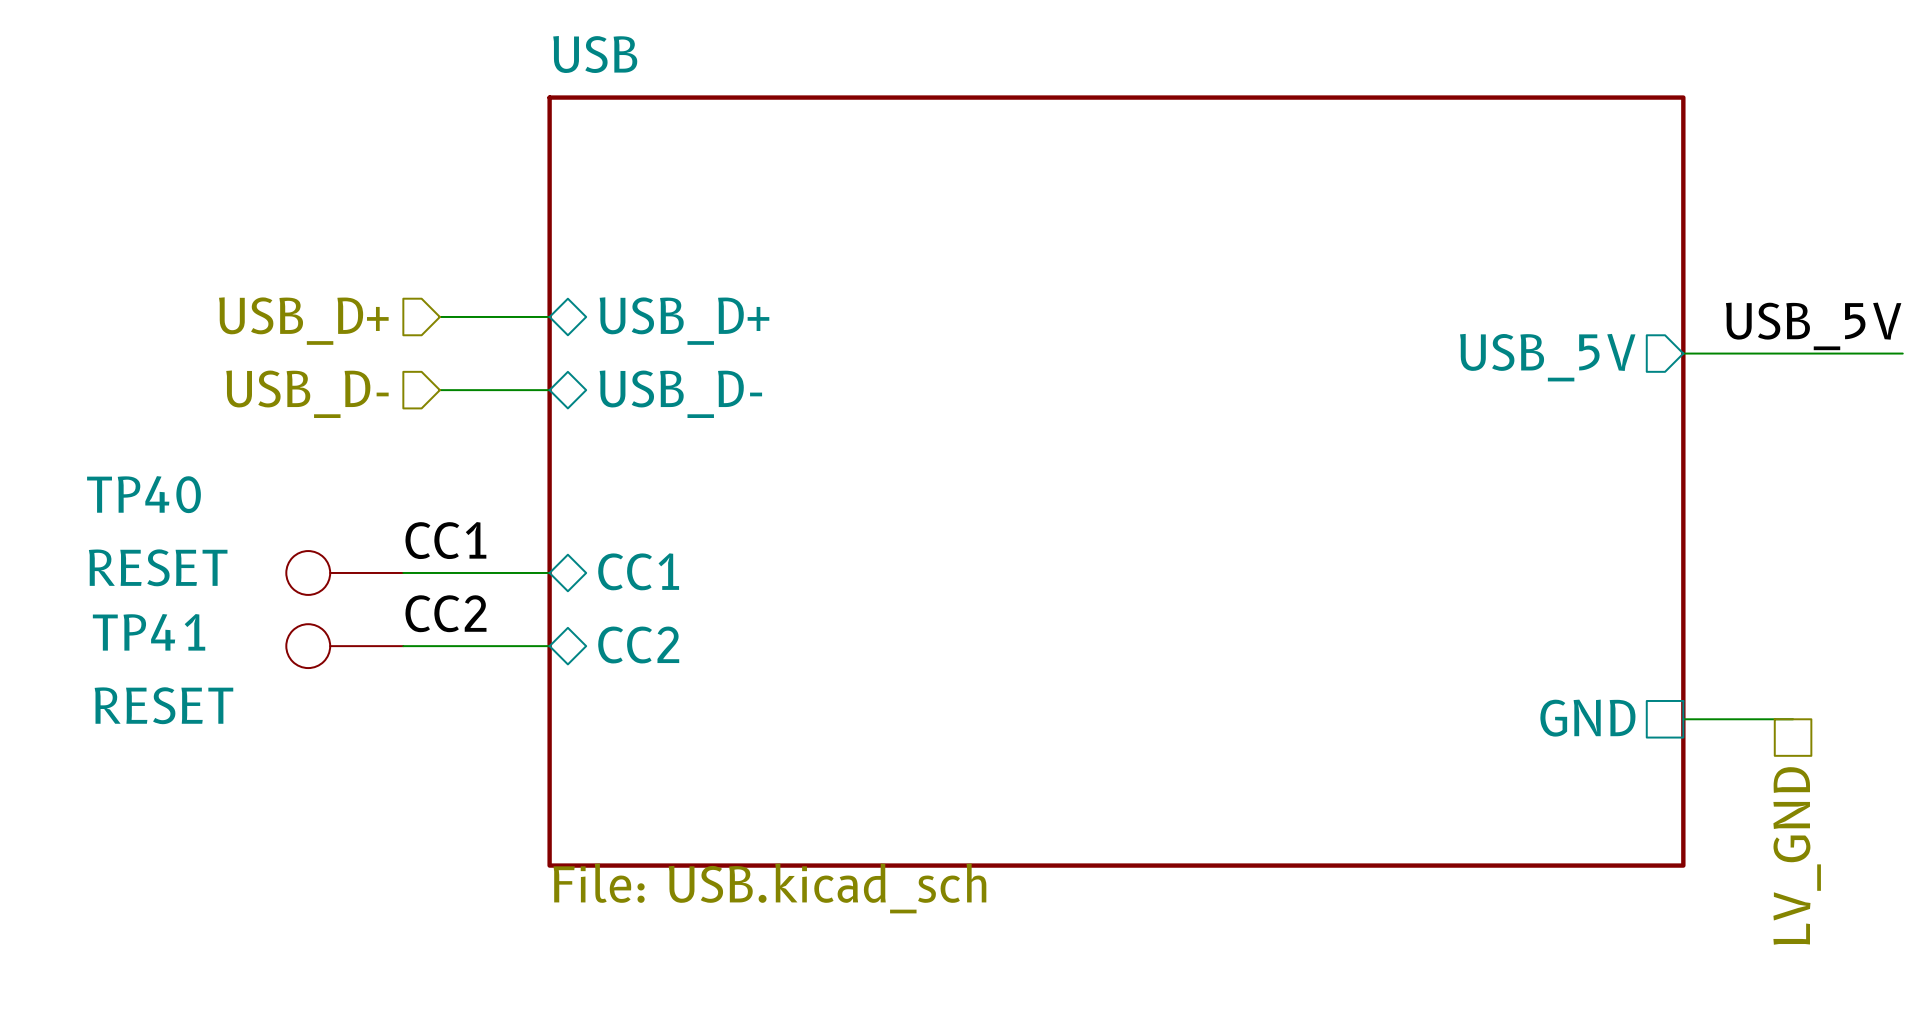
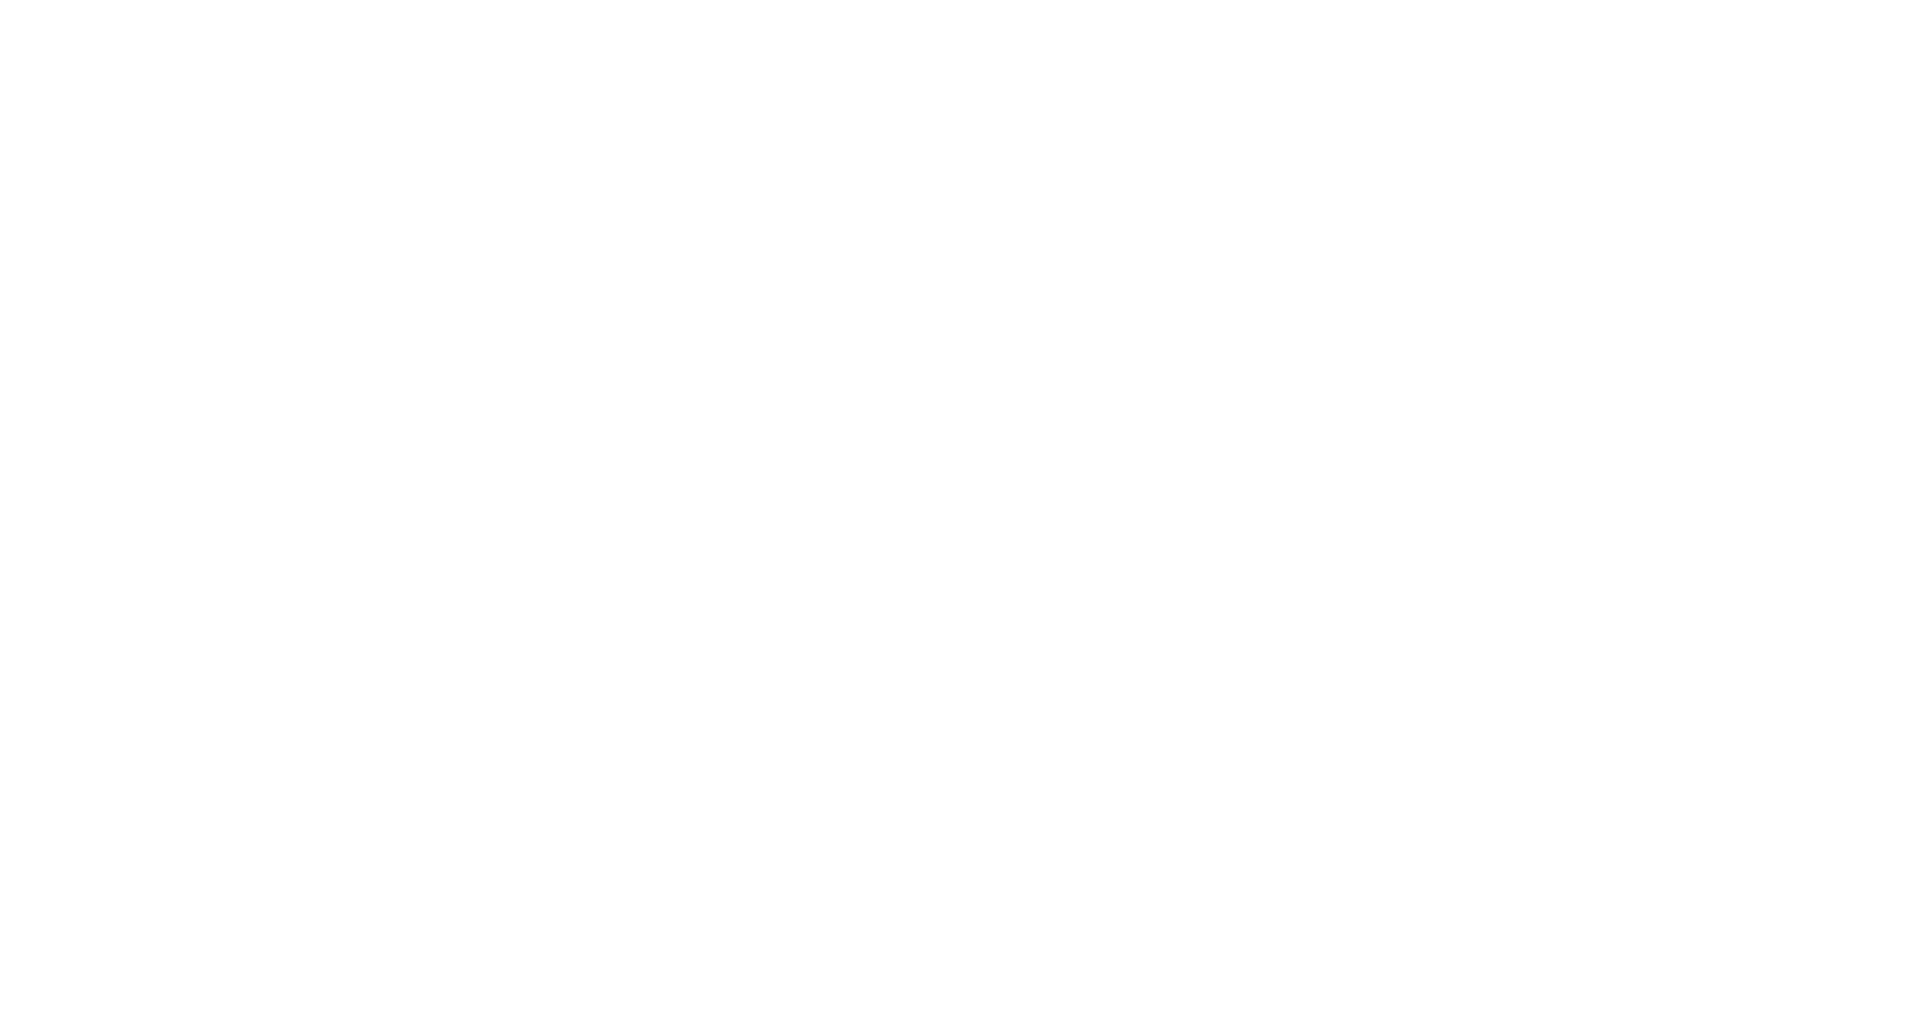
wire: (439, 316) (549, 316) -> none
hierarchical label: USB_D+ (303, 321) -> none
sheet pin: USB_D+ (684, 321) -> none
label: USB_5V (1813, 326) -> none
wire: (1683, 353) (1902, 353) -> none
sheet pin: USB_5V (1547, 357) -> none
wire: (439, 390) (549, 390) -> none
hierarchical label: USB_D- (307, 394) -> none
sheet pin: USB_D- (680, 394) -> none
sheet USB: File: USB.kicad_sch (1116, 481) -> none
label: CC1 (445, 540) -> none
sheet pin: CC1 (638, 571) -> none
TP40: RESET (344, 572) -> none
wire: (403, 572) (549, 572) -> none
label: CC2 (445, 613) -> none
sheet pin: CC2 (638, 645) -> none
TP41: RESET (344, 646) -> none
wire: (403, 646) (549, 646) -> none
sheet pin: GND (1587, 718) -> none
wire: (1683, 719) (1793, 719) -> none
hierarchical label: LV_GND (1797, 855) -> none

